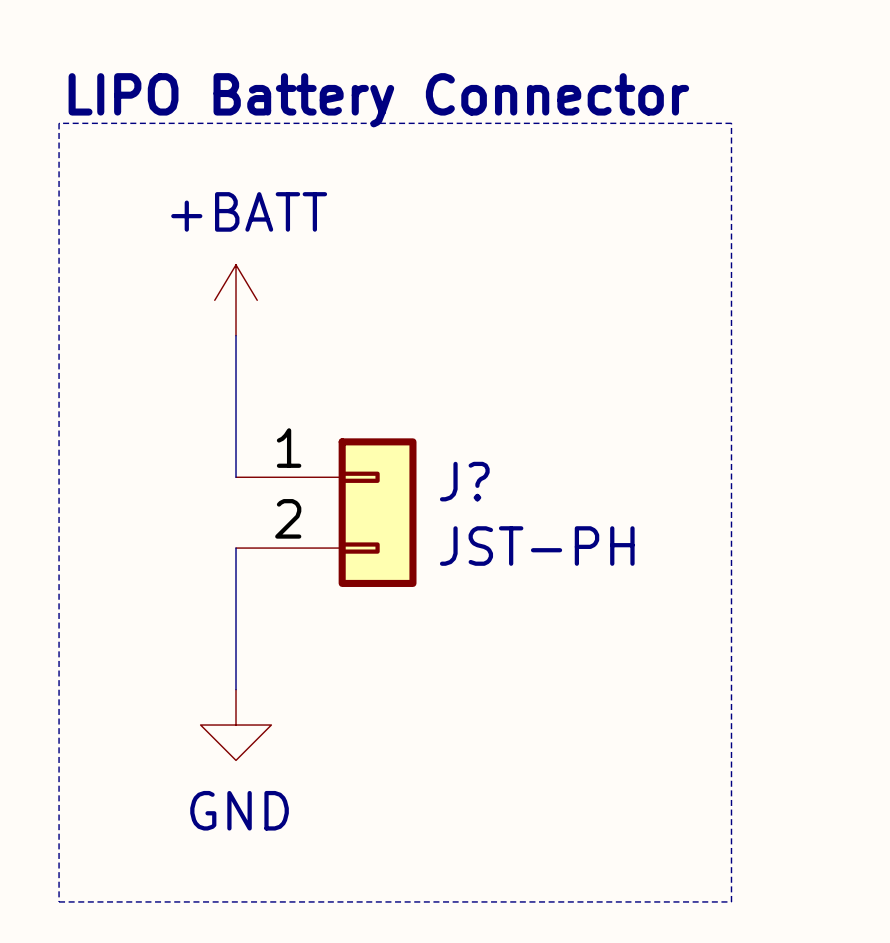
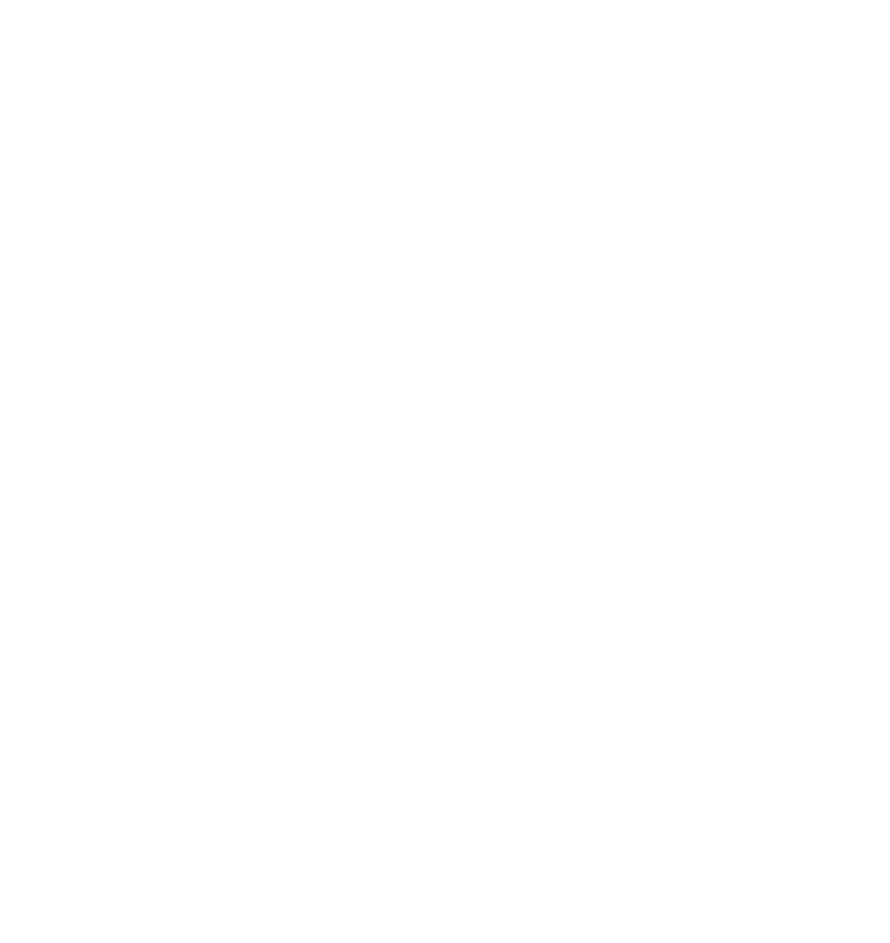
text: LIPO Battery Connector (378, 100) -> none
line: (59, 123) (731, 123) (731, 901) (59, 901) (59, 123) -> none
power symbol: +BATT (236, 300) -> none
wire: (236, 335) (236, 477) -> none
J?: JST-PH (326, 512) -> none
wire: (236, 548) (236, 689) -> none
power symbol: GND (236, 725) -> none

